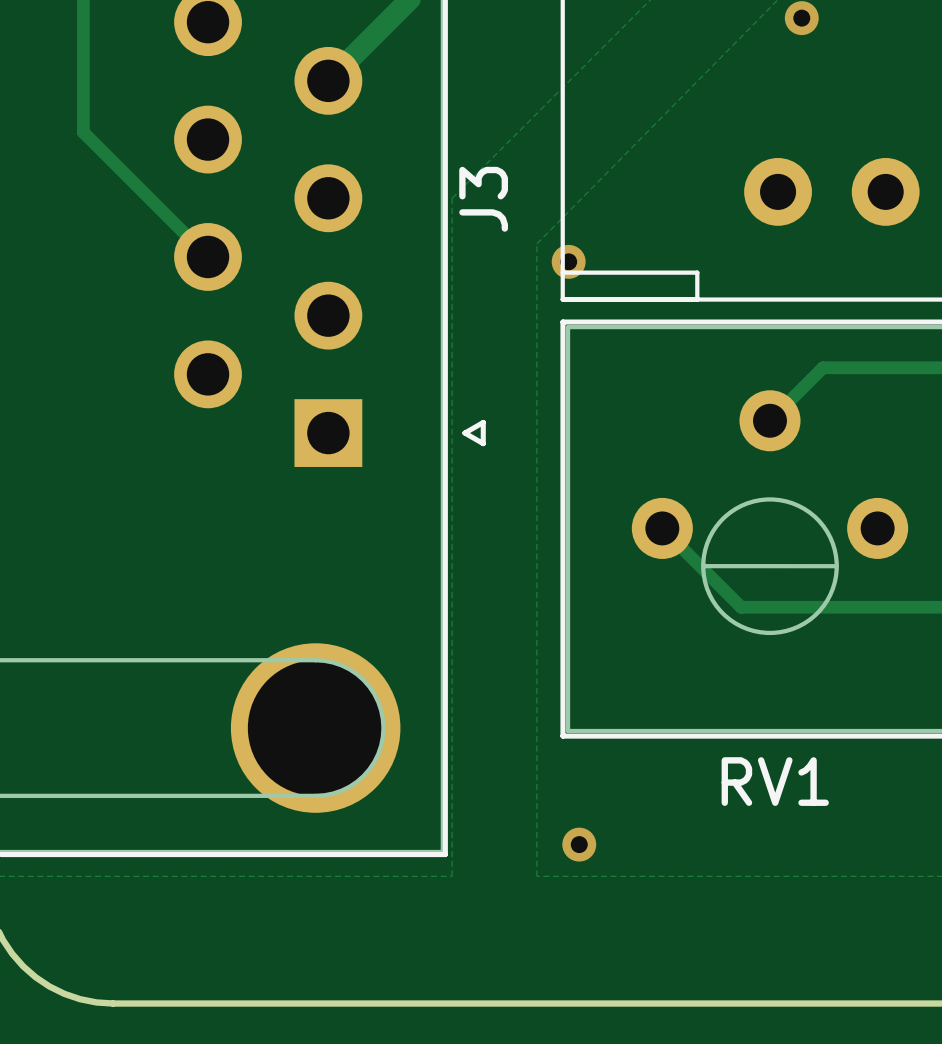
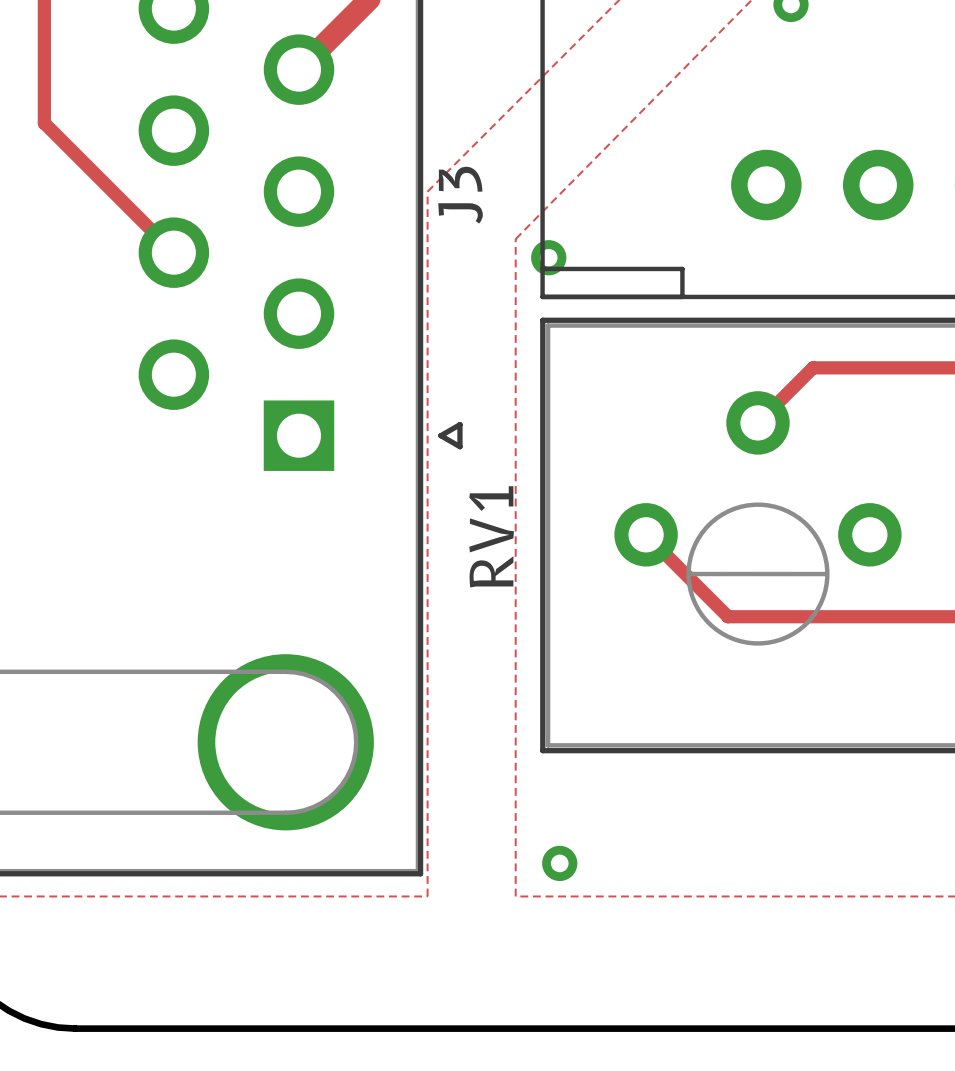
RV1 name rotation: 0° (775, 781) -> 90° counterclockwise (491, 536)
RV1 name position: RV1 (775, 781) -> RV1 (491, 536)

